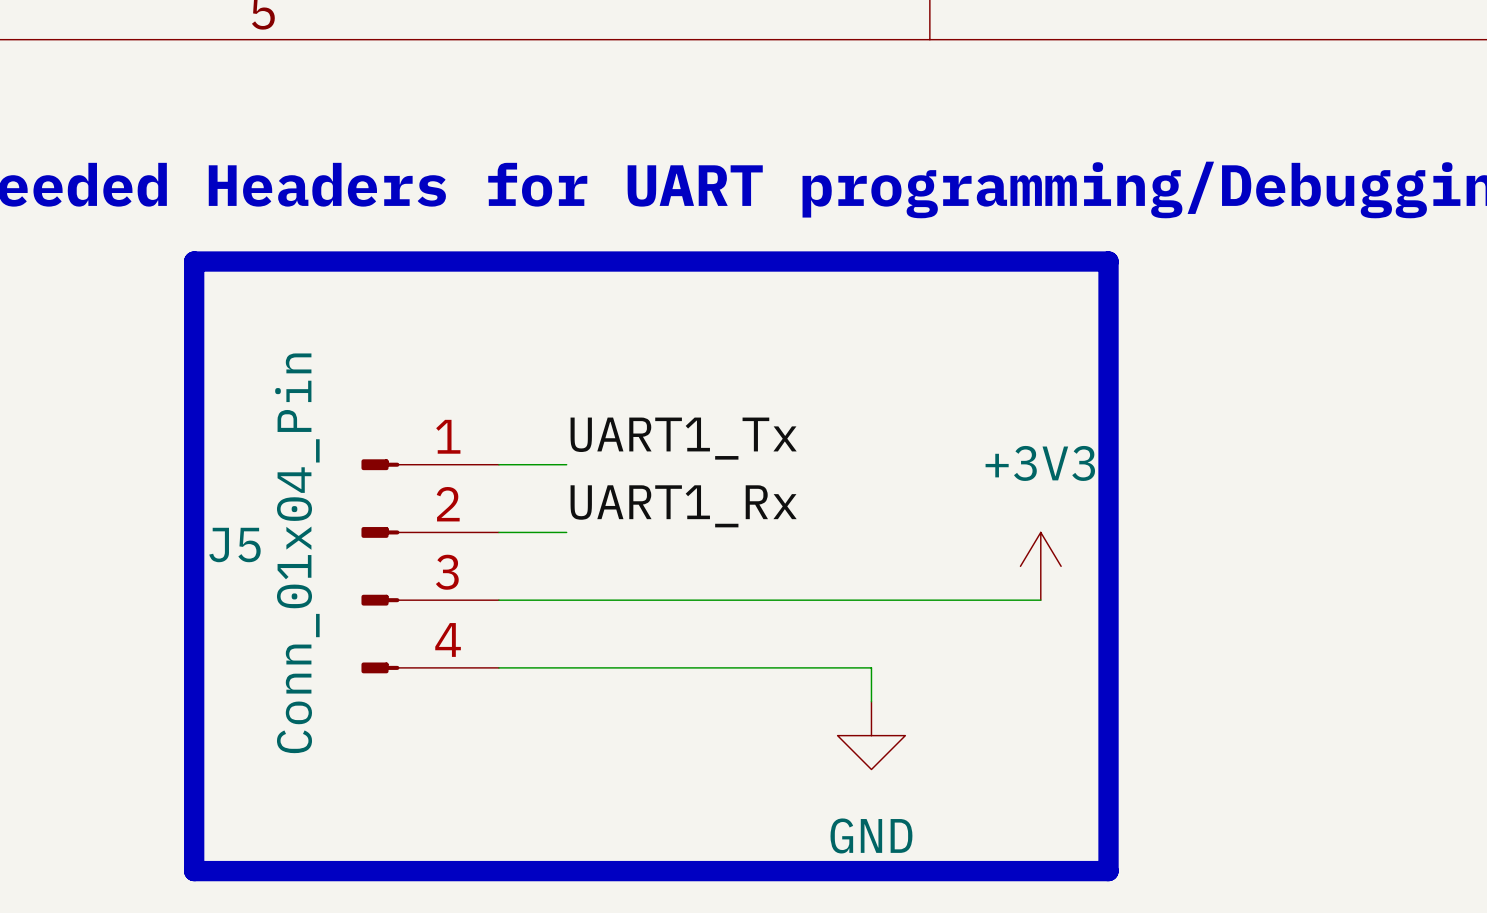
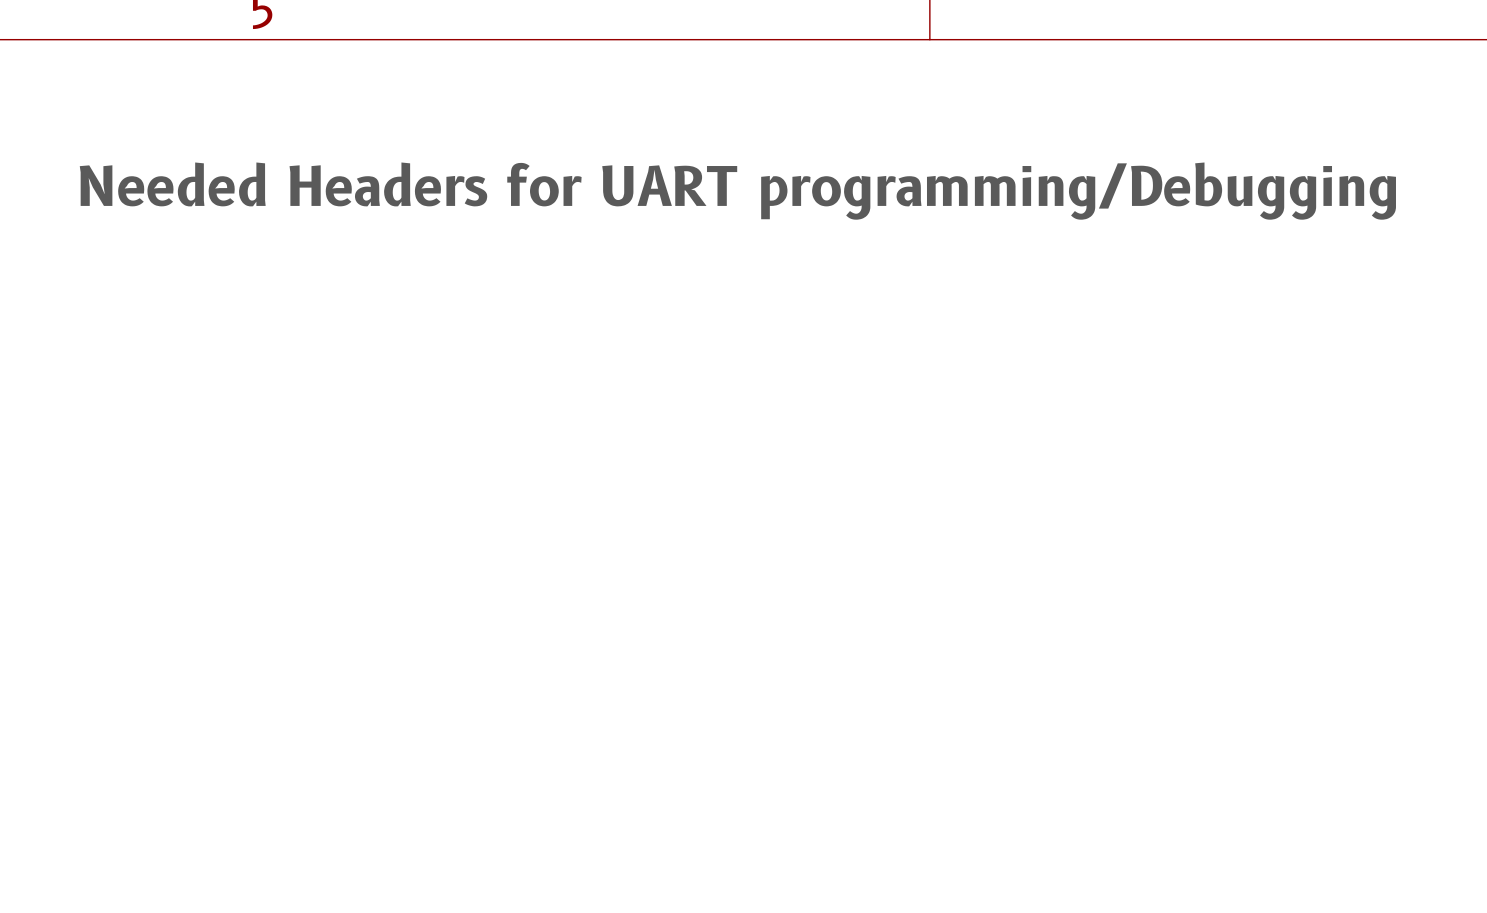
line: (194, 261) (1108, 261) (1108, 871) (194, 871) (194, 261) -> none
label: UART1_Tx (683, 438) -> none
wire: (498, 464) (566, 464) -> none
label: UART1_Rx (683, 506) -> none
wire: (498, 532) (566, 532) -> none
J5: Conn_01x04_Pin (430, 566) -> none
power symbol: +3V3 (1040, 566) -> none
wire: (498, 600) (1040, 600) -> none
wire: (498, 667) (871, 667) (871, 701) -> none
power symbol: GND (871, 735) -> none

